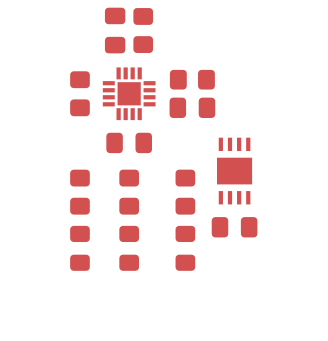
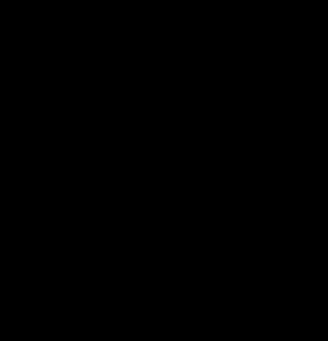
part: (115, 30) -> none
part: (143, 30) -> none
part: (192, 79) -> none
part: (79, 93) -> none
part: (129, 93) -> none
part: (192, 107) -> none
part: (129, 142) -> none
part: (234, 171) -> none
part: (79, 192) -> none
part: (129, 192) -> none
part: (185, 192) -> none
part: (234, 227) -> none
part: (79, 248) -> none
part: (129, 248) -> none
part: (185, 248) -> none

